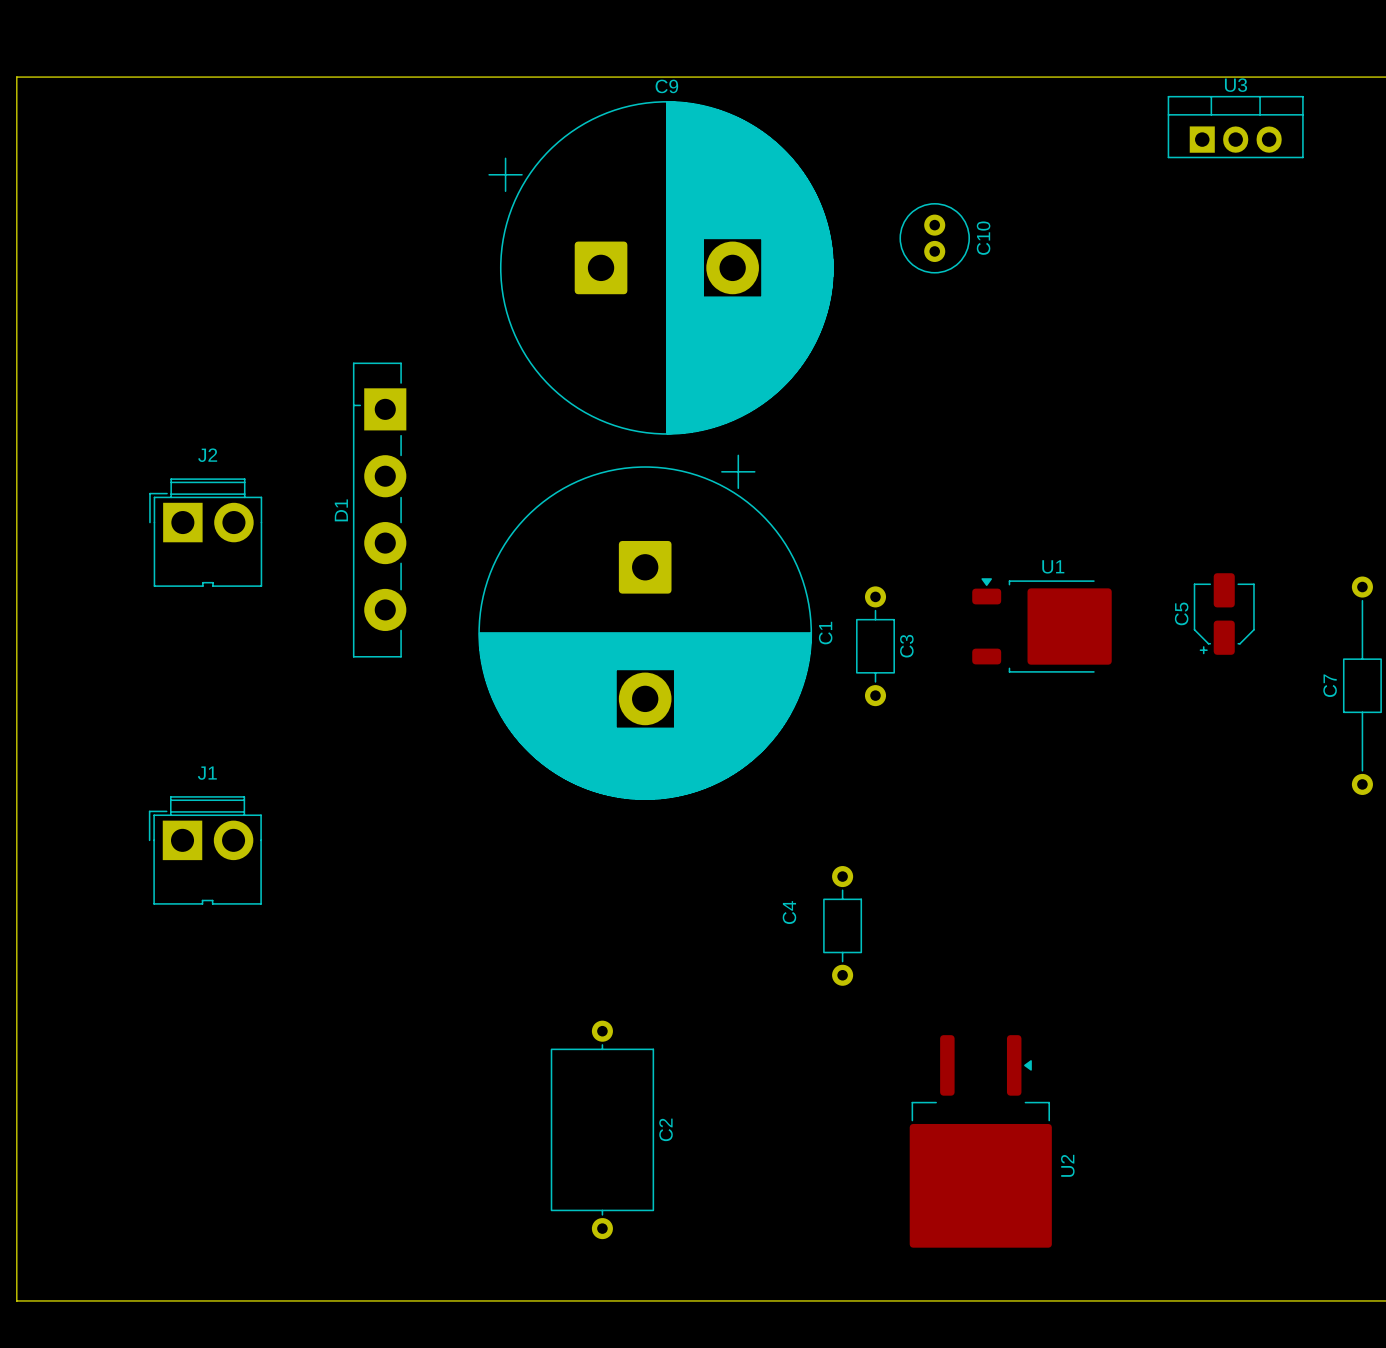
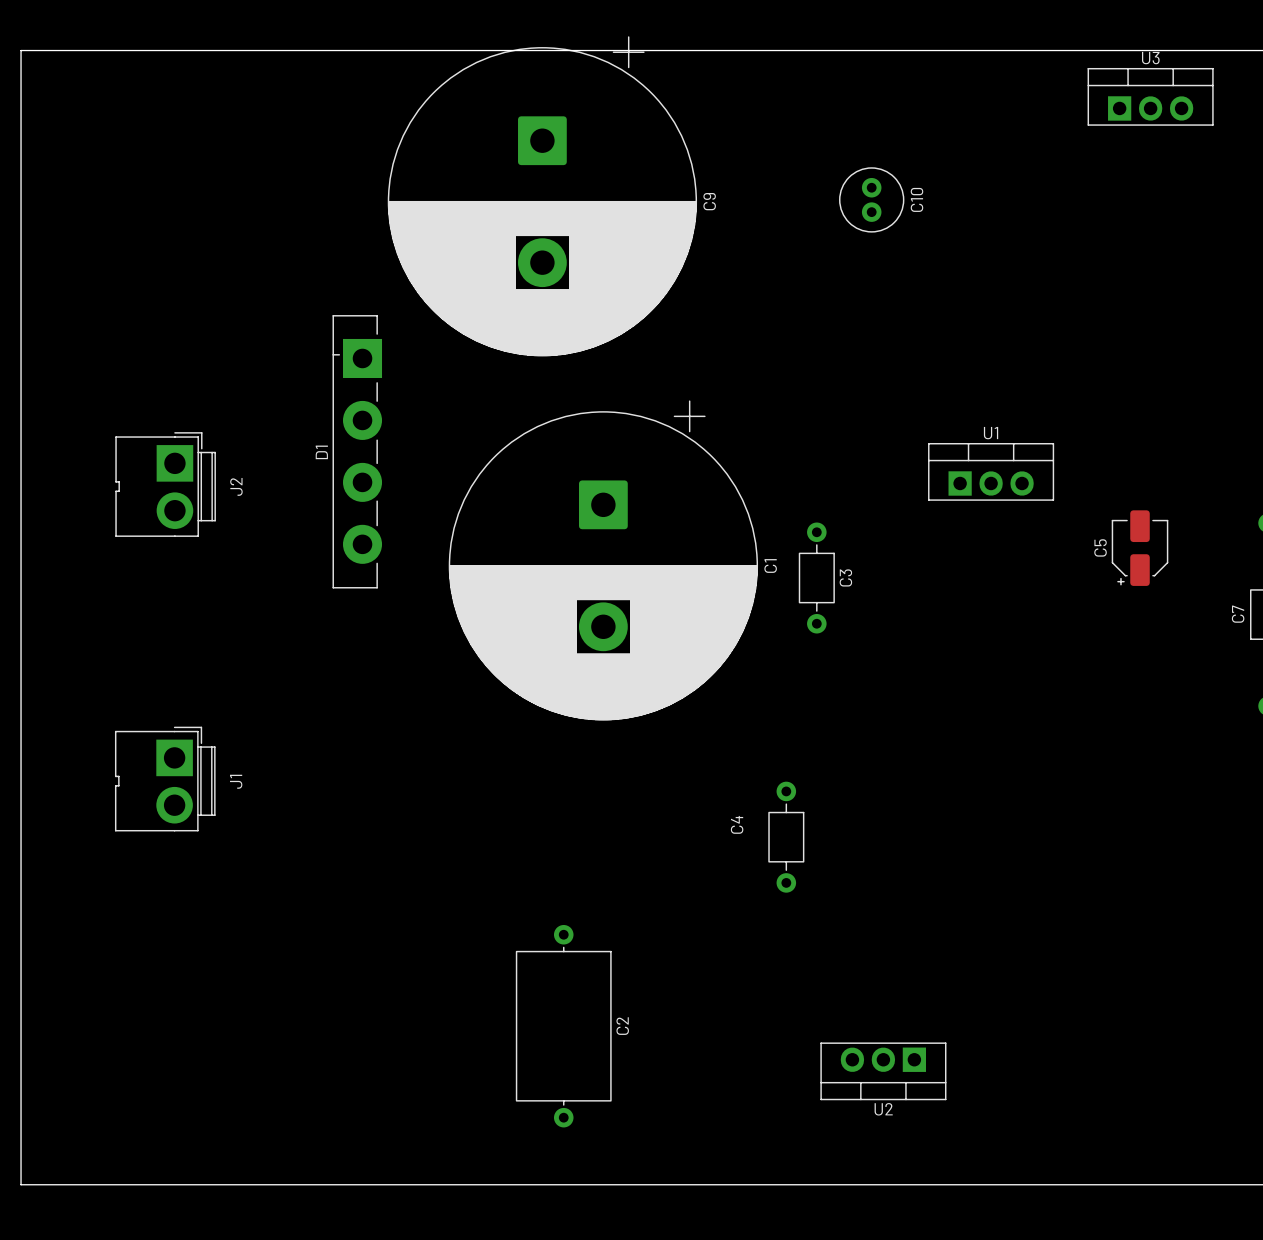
C9 rotation: 0° (661, 267) -> 90° clockwise (542, 196)
J2 rotation: 0° (205, 532) -> 90° clockwise (165, 484)
U1 footprint: [972, 578, 1112, 673] -> [928, 443, 1055, 501]
J1 rotation: 0° (205, 850) -> 90° clockwise (165, 779)
U2 footprint: [909, 1035, 1052, 1248] -> [820, 1042, 947, 1101]
U2 name position: U2 (1067, 1165) -> U2 (883, 1109)

